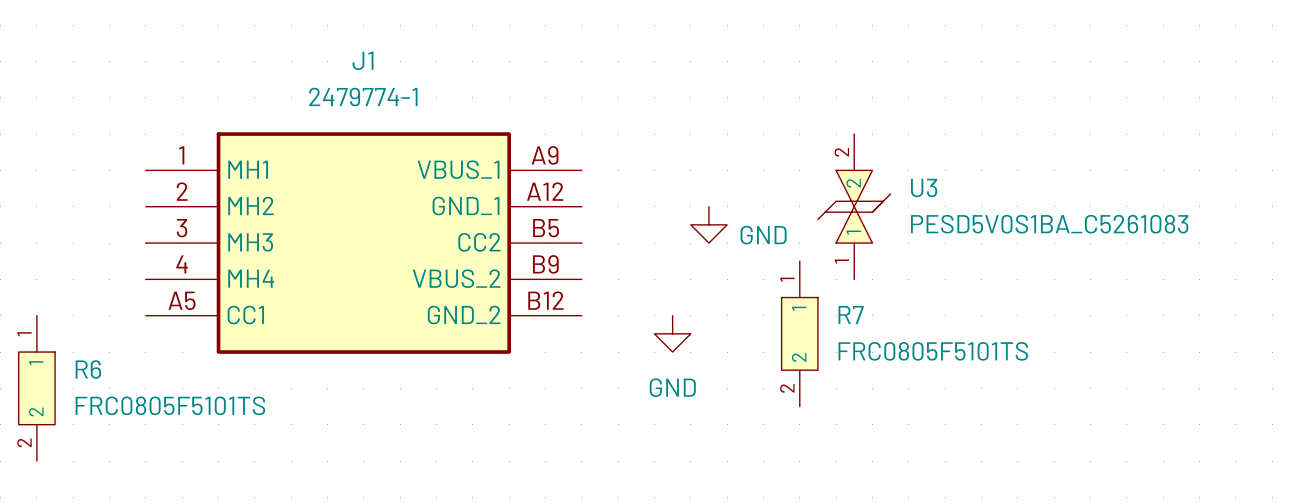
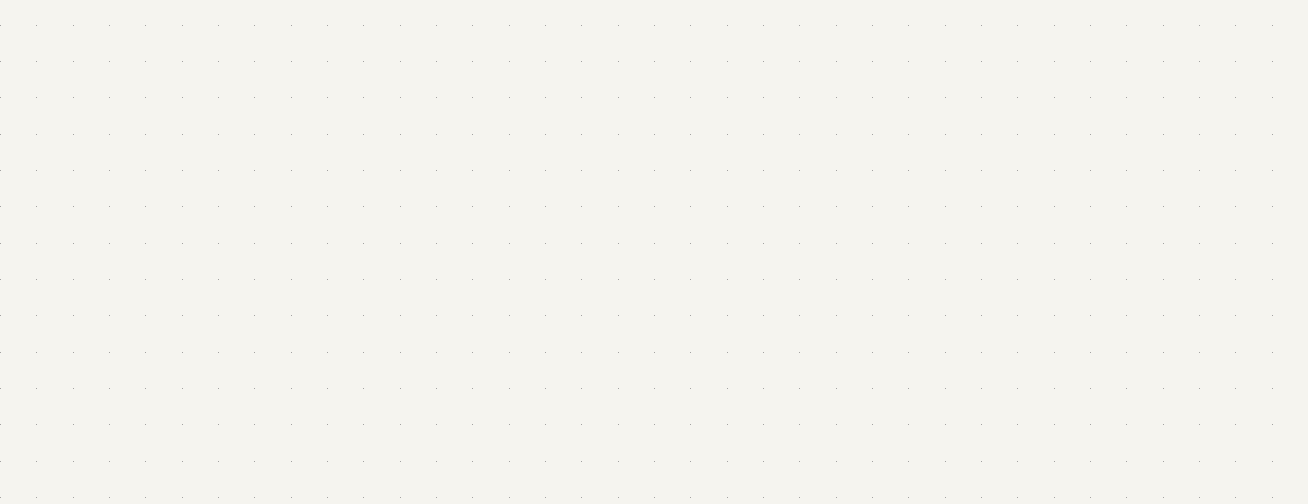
U3: PESD5V0S1BA_C5261083 (854, 206) -> none
power symbol: GND (708, 224) -> none
J1: 2479774-1 (363, 243) -> none
power symbol: GND (672, 333) -> none
R7: FRC0805F5101TS (799, 333) -> none
R6: FRC0805F5101TS (36, 388) -> none

